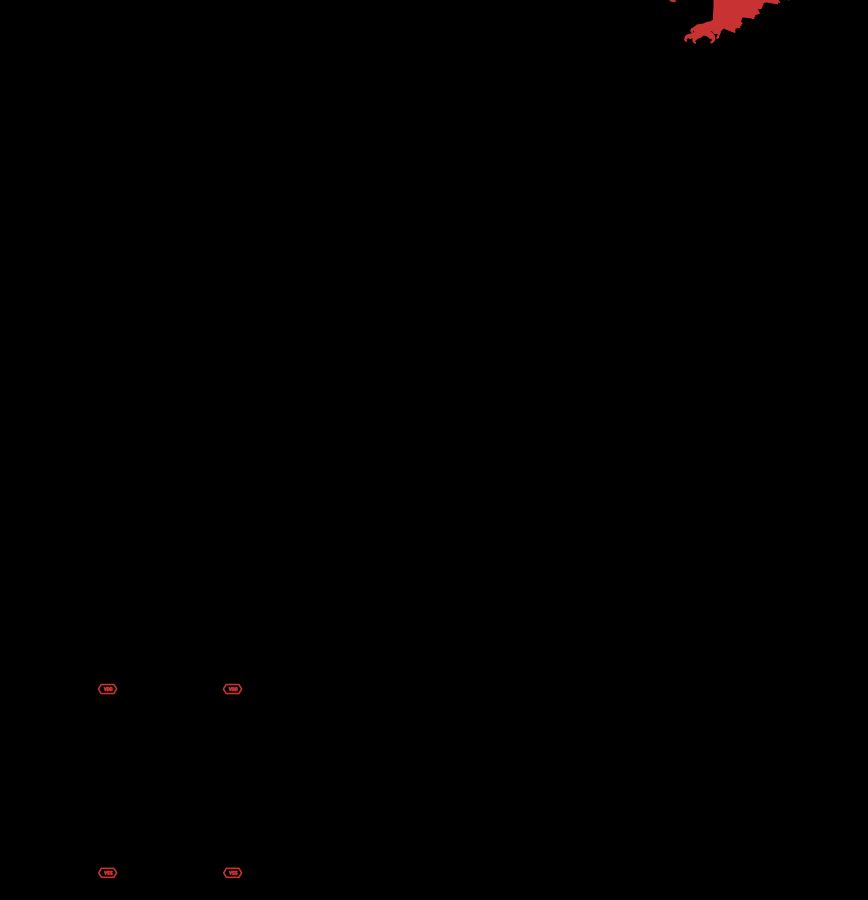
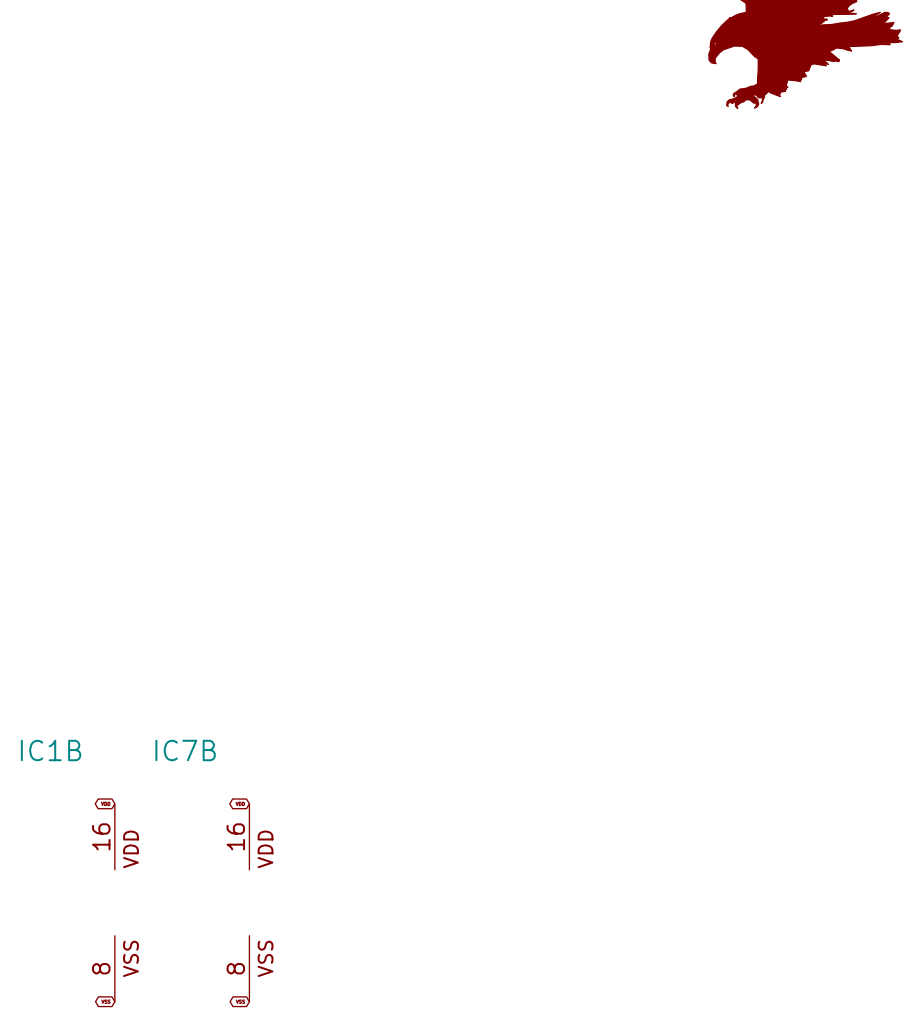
IC1B: none -> (114, 902)
IC7B: none -> (249, 902)

